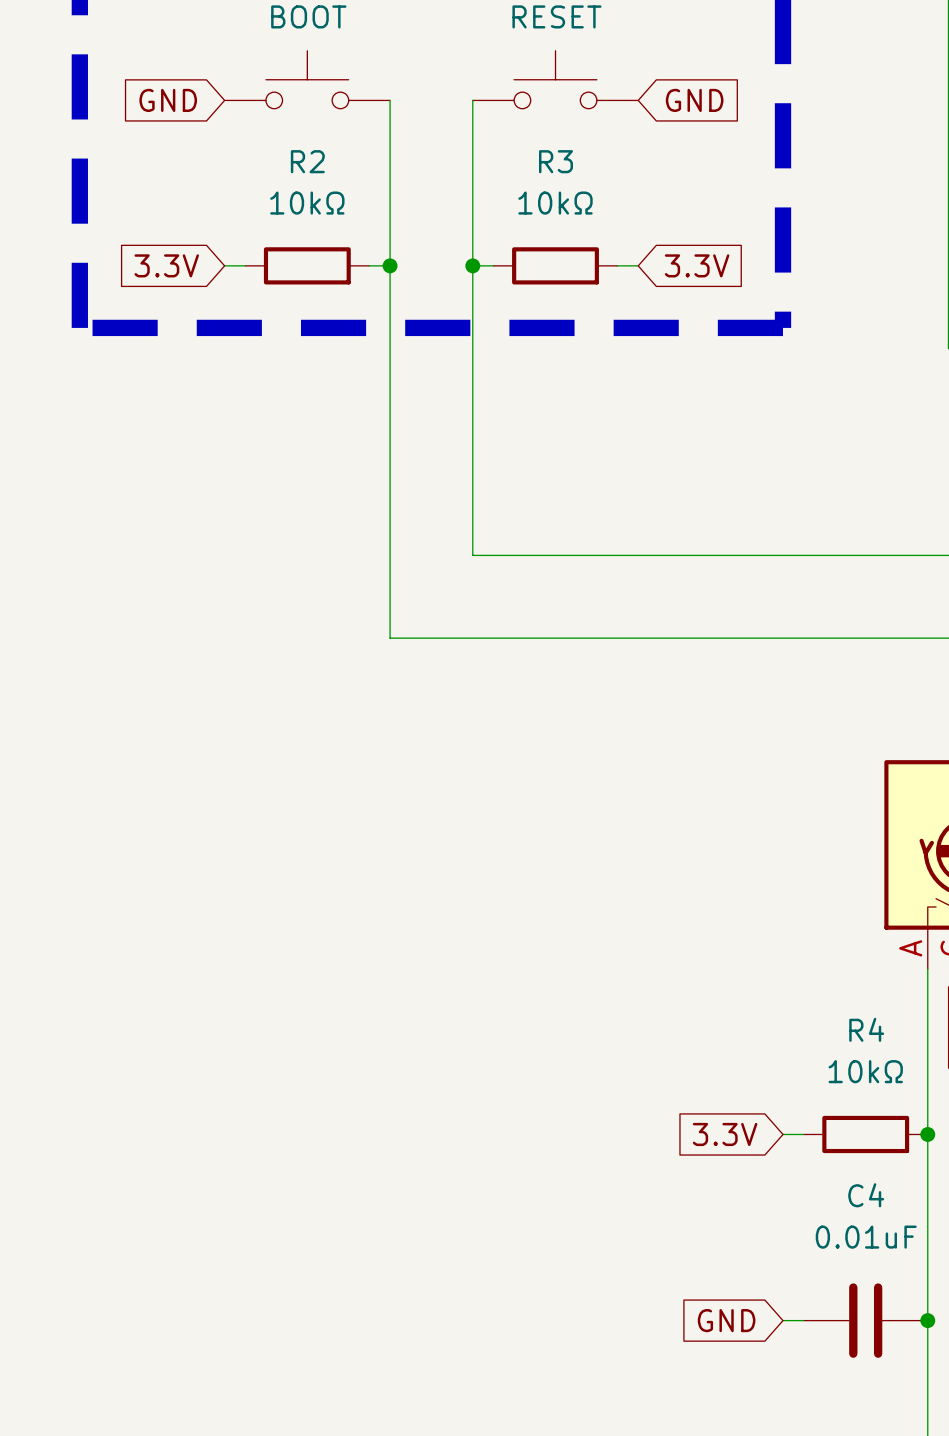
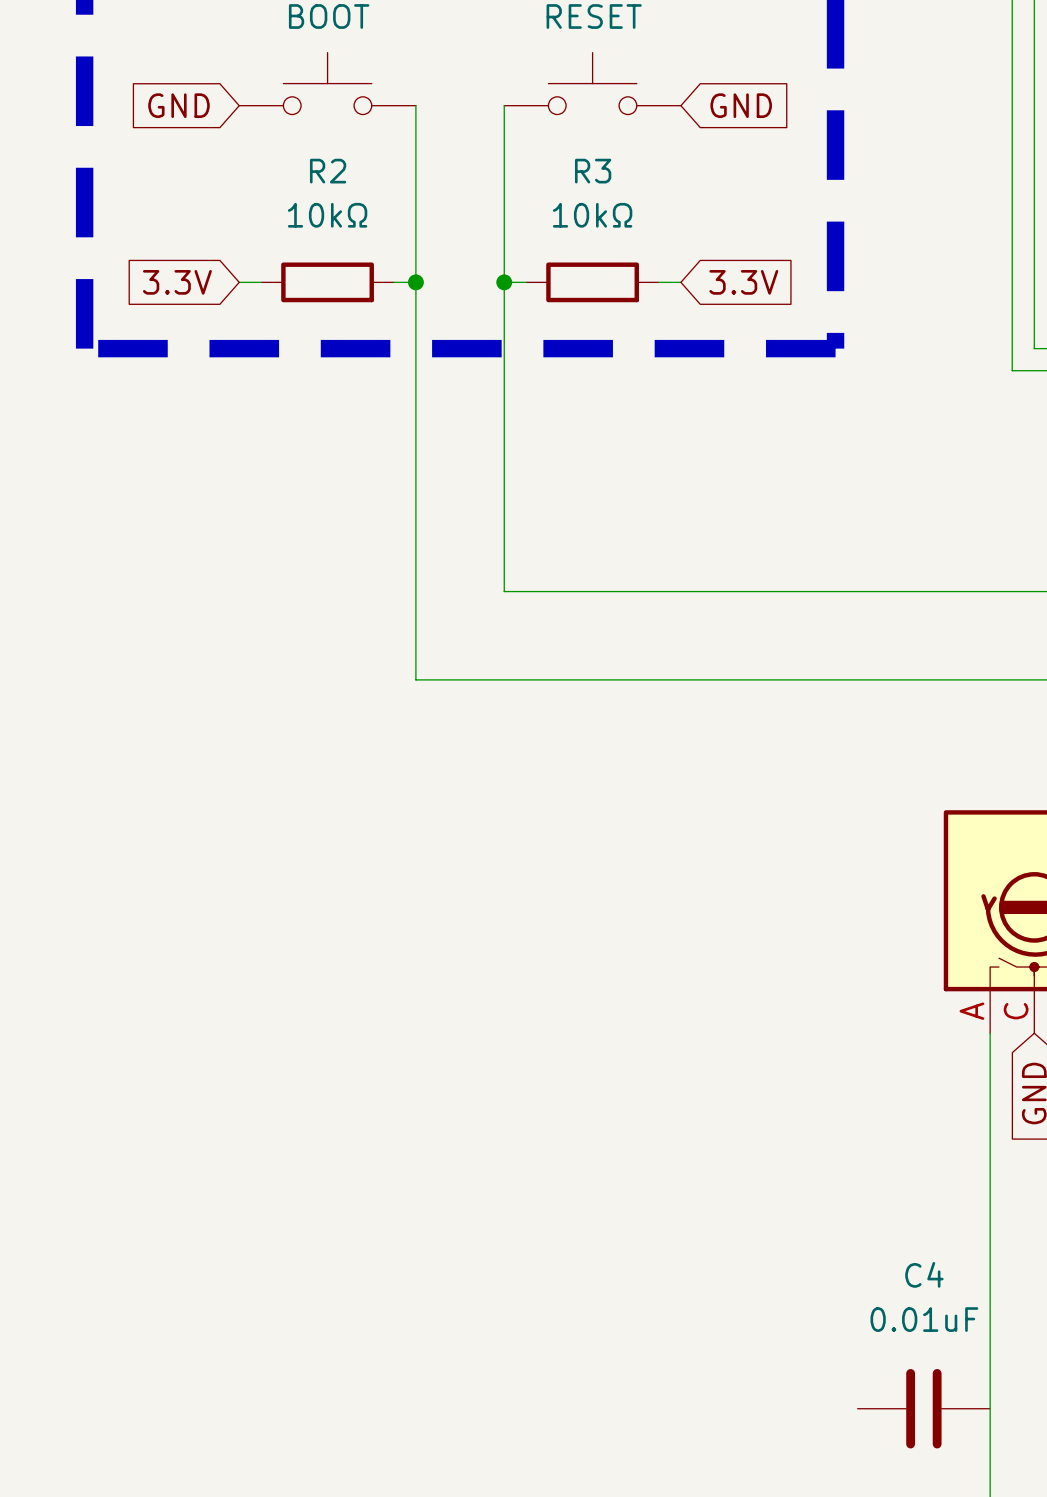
global label: 3.3V (725, 1134) -> none
wire: (783, 1134) (803, 1134) -> none
R4: 10kΩ (865, 1134) -> none
junction: (927, 1134) -> none
global label: GND (726, 1320) -> none
wire: (783, 1320) (803, 1320) -> none
junction: (927, 1320) -> none

